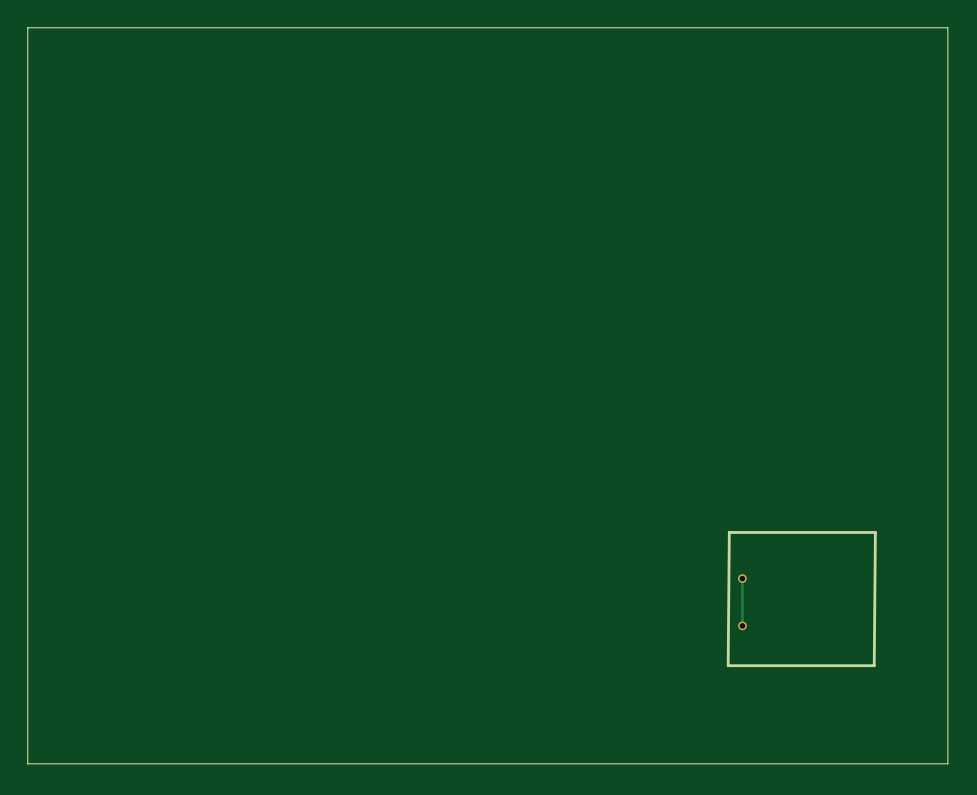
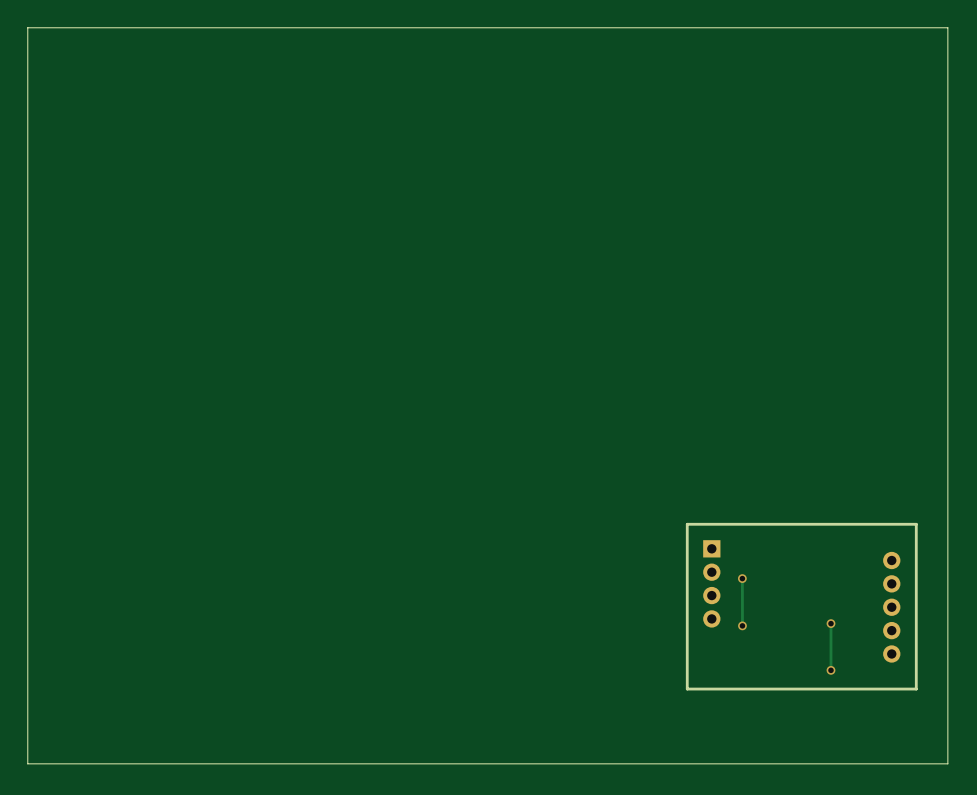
board edge: (875, 532) (874, 665) (728, 665) (729, 532) (875, 532) -> (916, 524) (916, 689) (687, 689) (687, 524) (916, 524)
part: none -> (711, 583)
part: none -> (891, 607)
track: none -> (830, 623) (830, 670)
via: none -> (830, 623)
via: none -> (830, 670)

